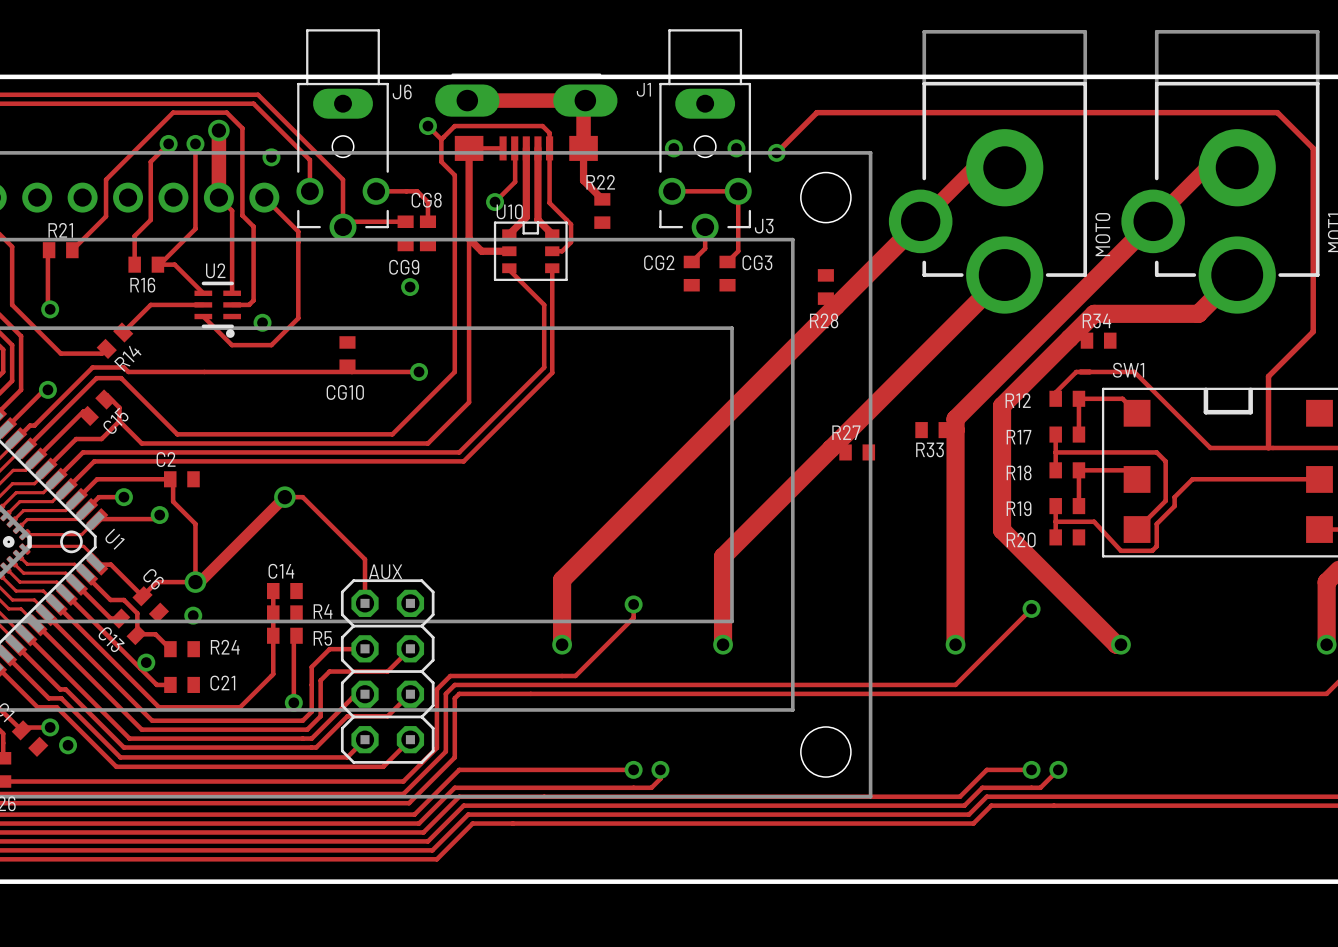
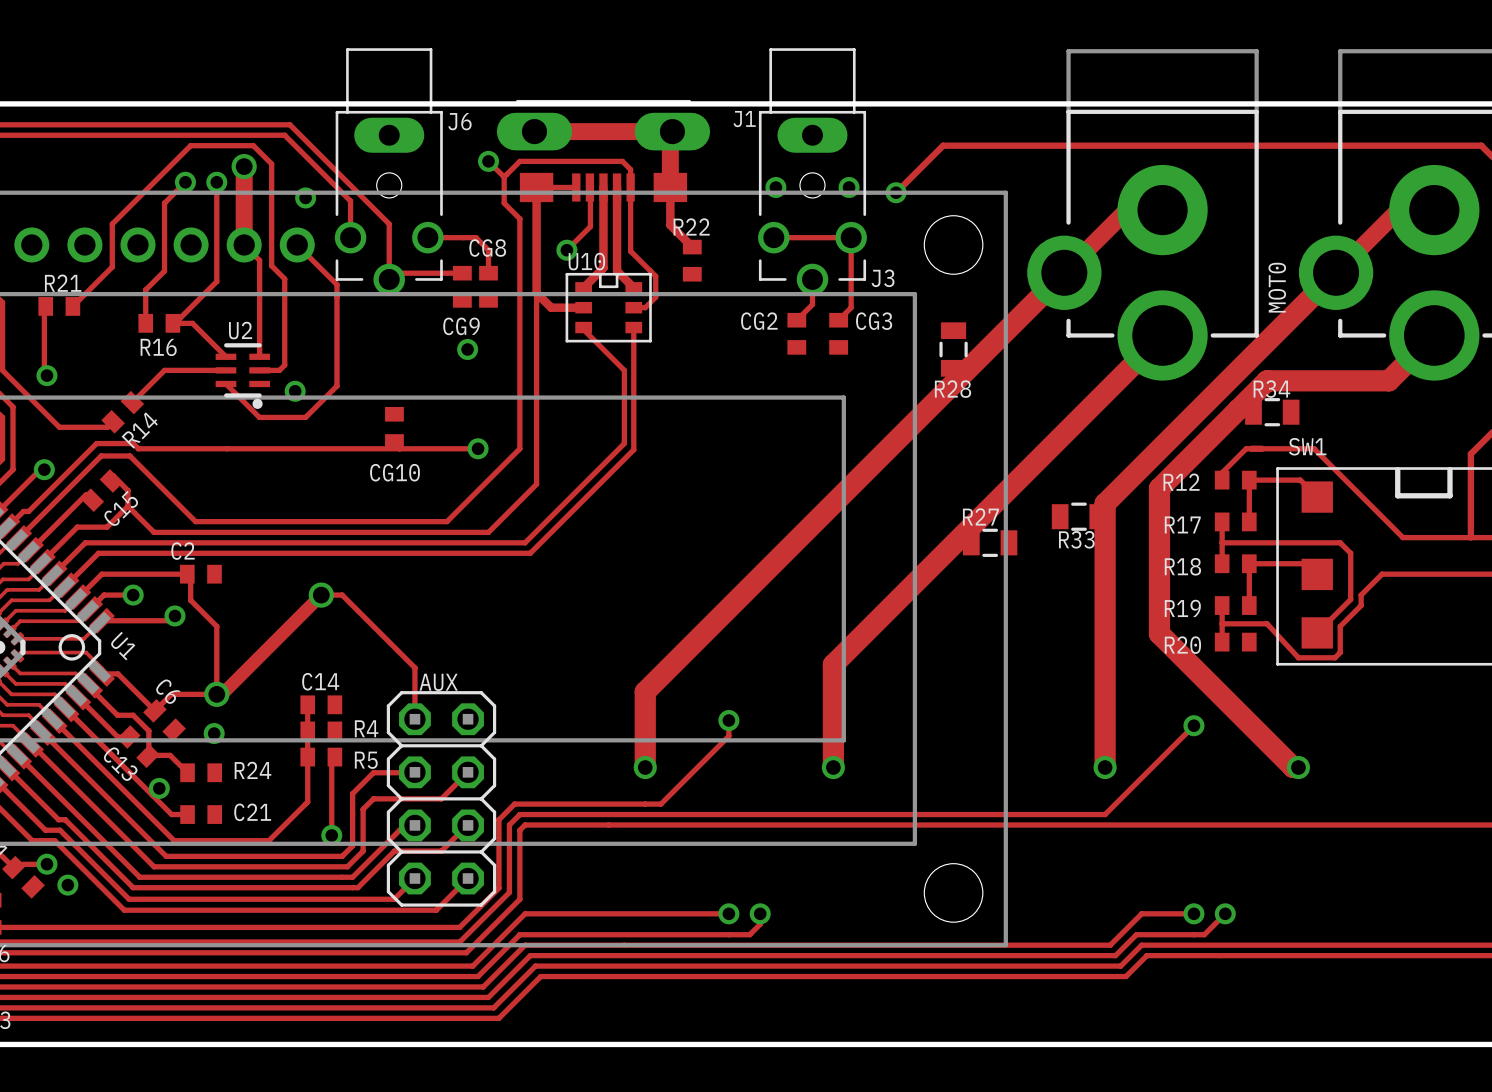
R28 footprint: [817, 269, 834, 305] -> [939, 322, 968, 377]
R34 footprint: [1080, 332, 1117, 349] -> [1245, 398, 1300, 427]
R33 footprint: [915, 422, 952, 439] -> [1051, 502, 1107, 531]
R27 footprint: [839, 444, 876, 461] -> [962, 528, 1018, 557]

